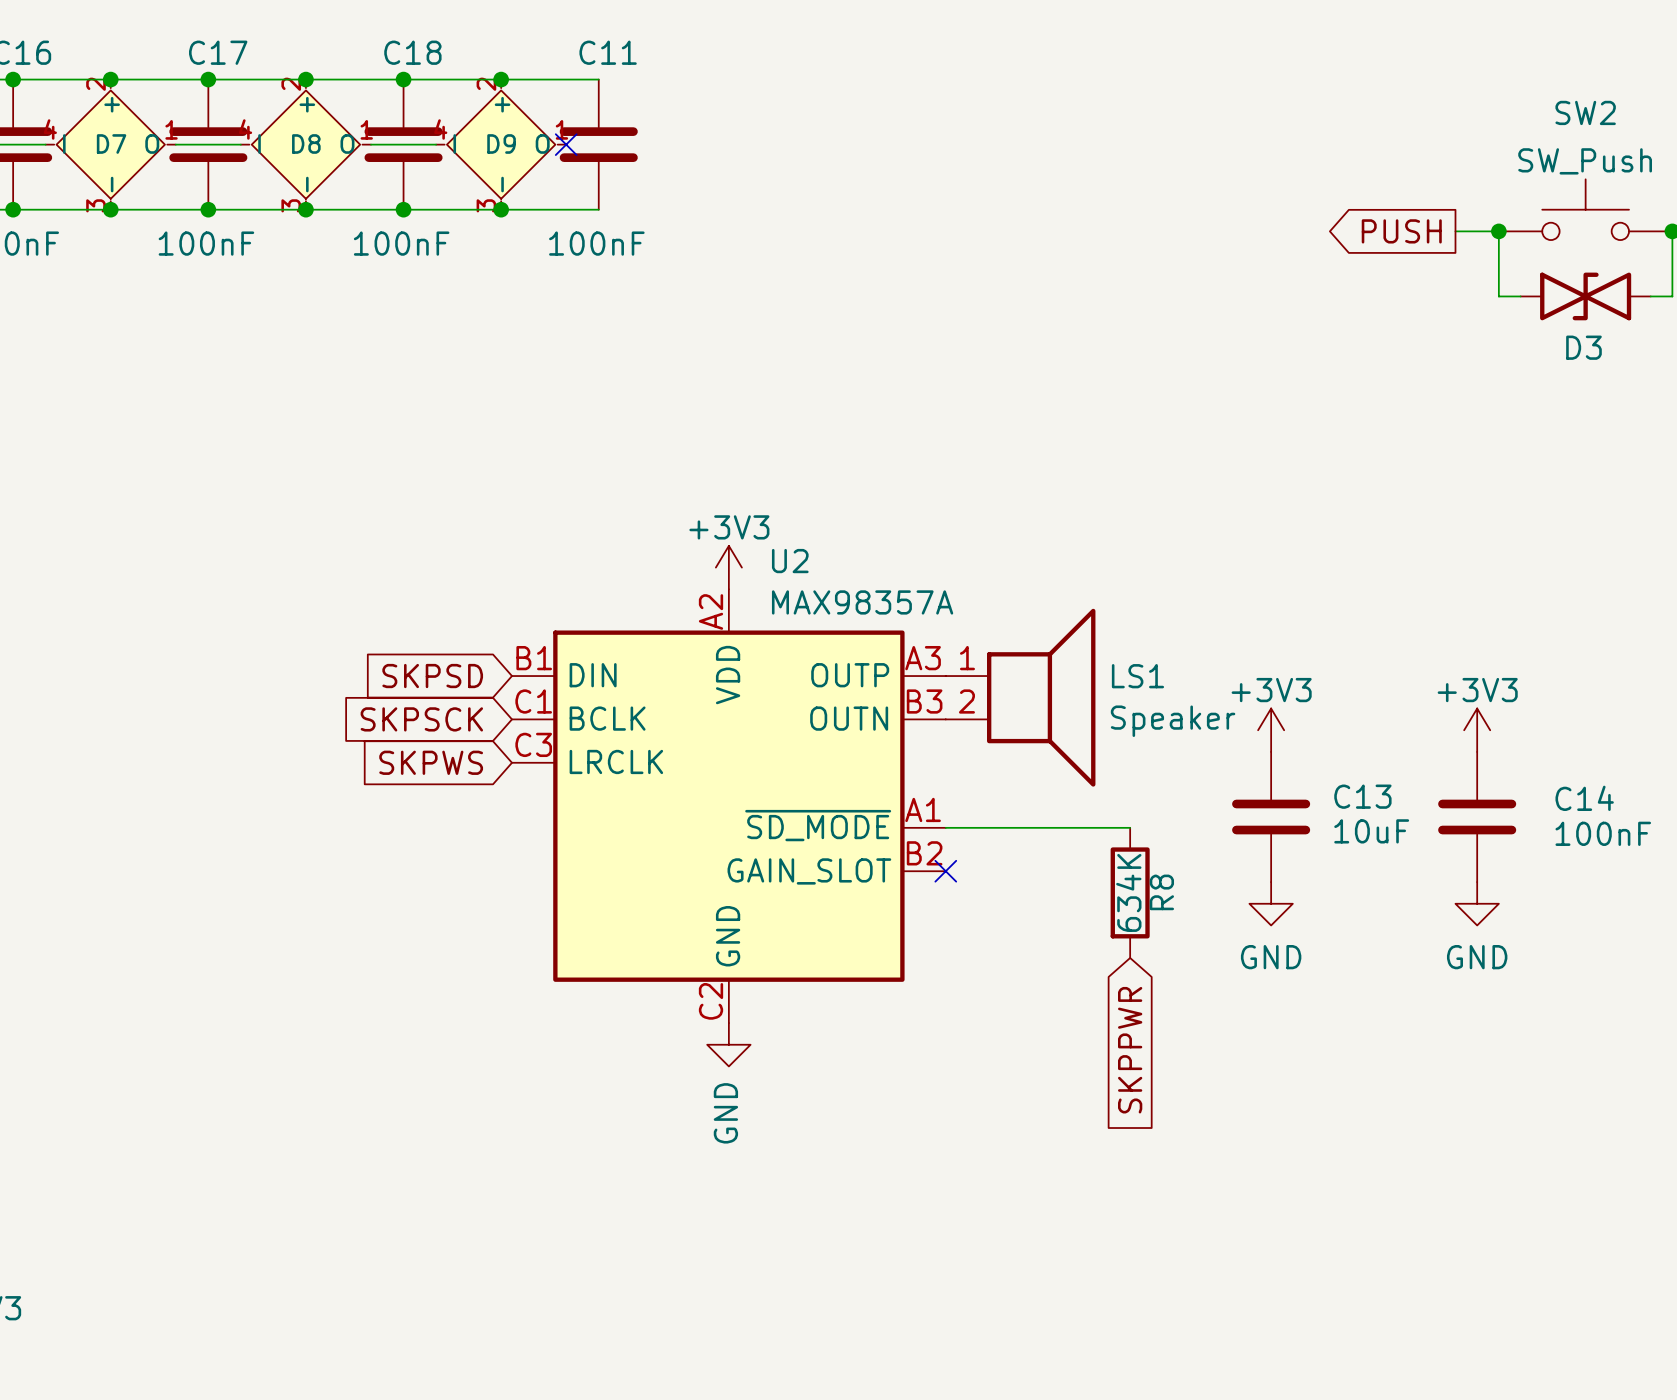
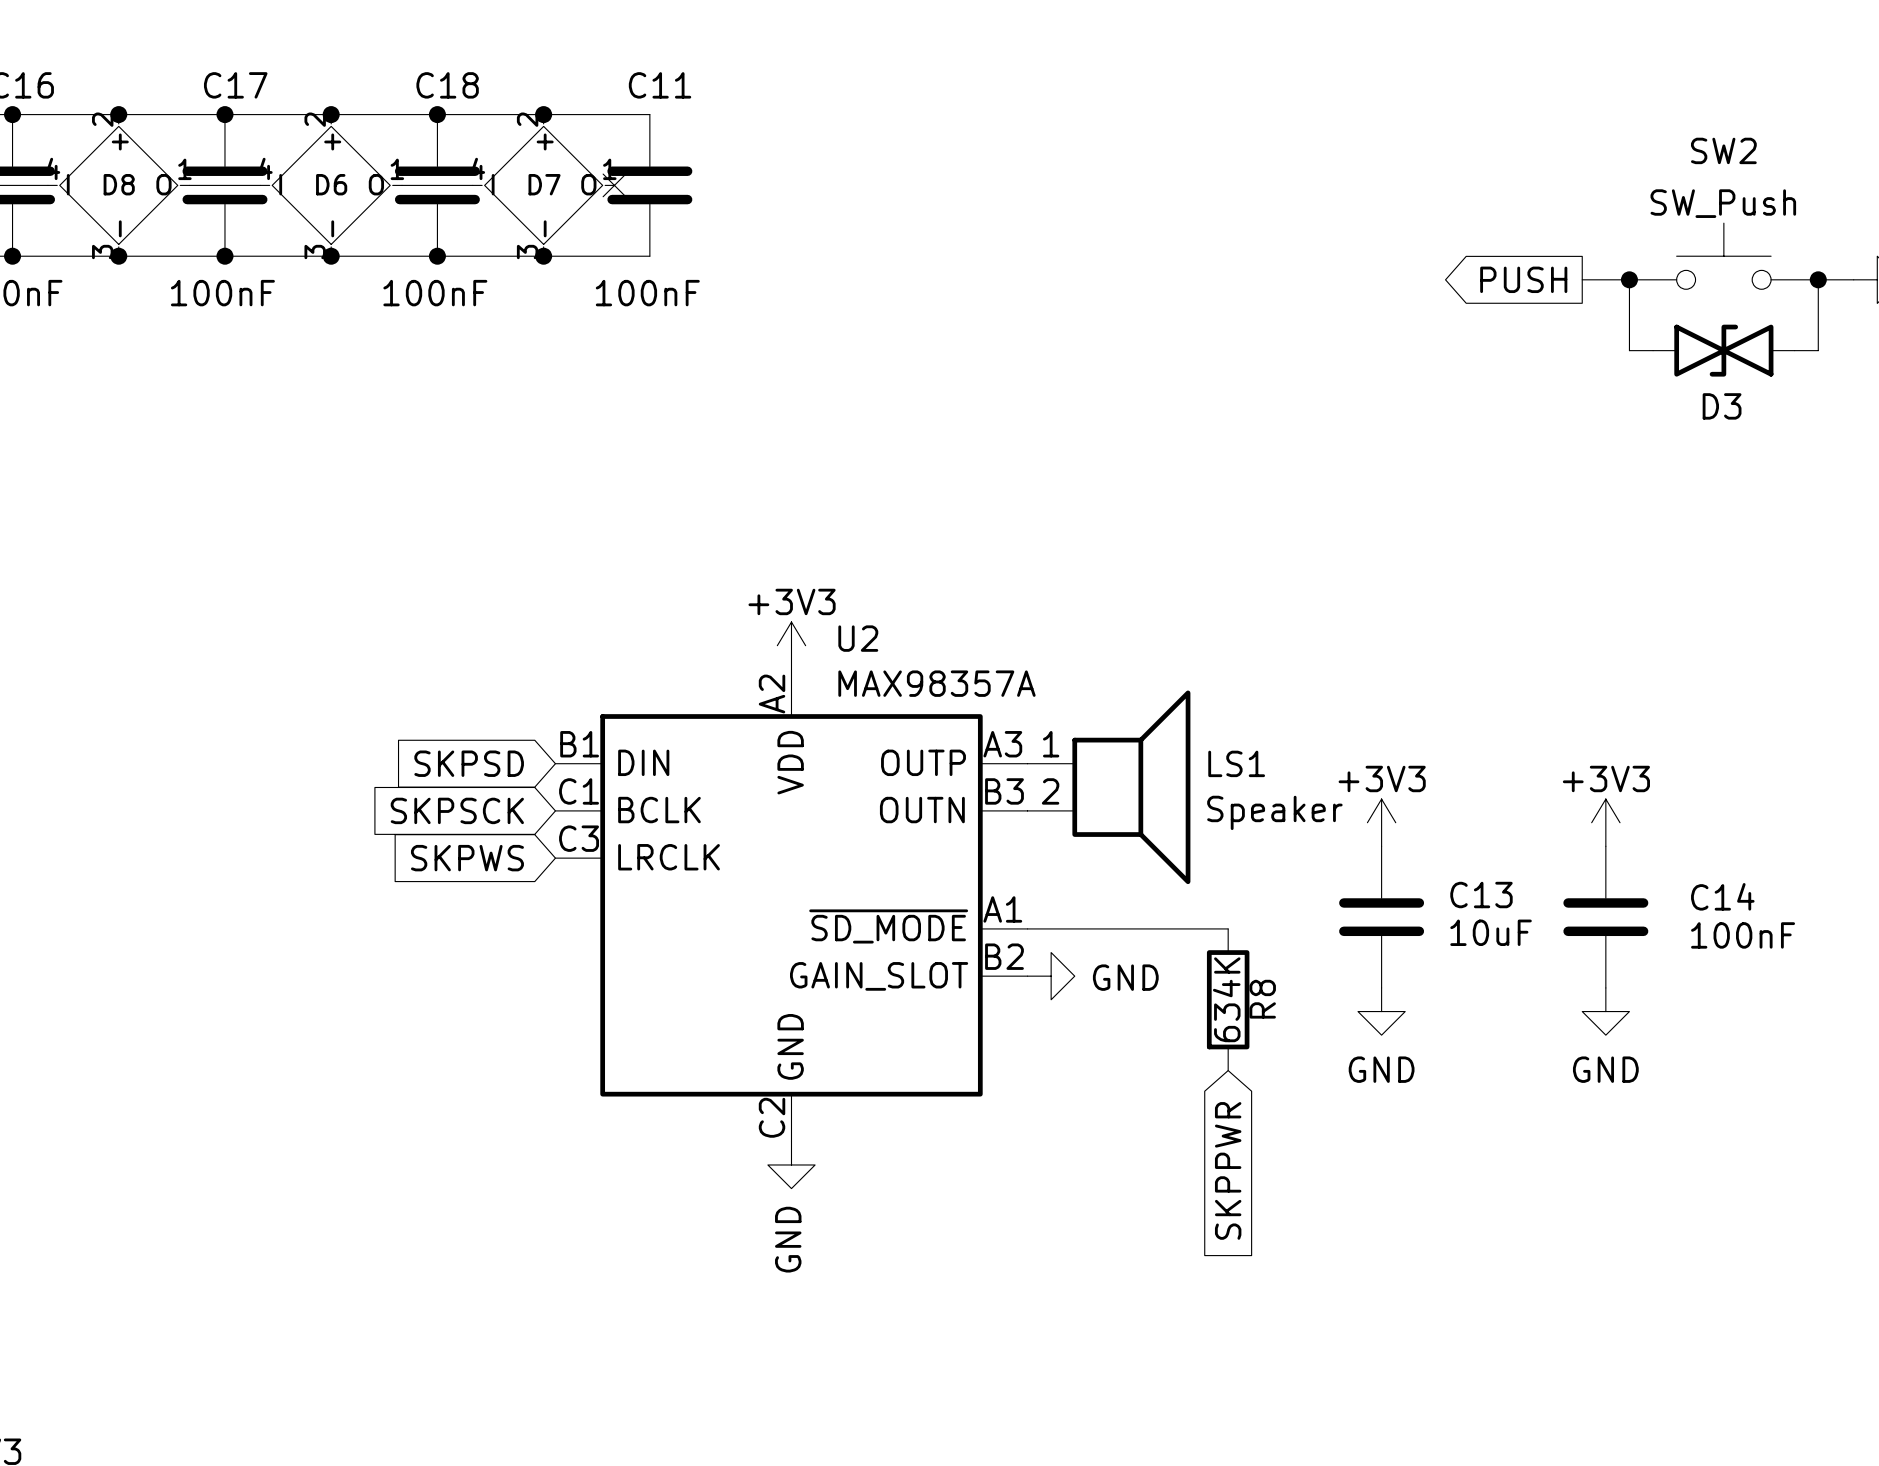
D7 name: D7 (111, 143) -> D8 (119, 184)
D8 name: D8 (306, 143) -> D6 (331, 184)
D9 name: D9 (501, 143) -> D7 (544, 184)
no-connect mark: (945, 871) -> none
power symbol: none -> GND (1051, 976)

